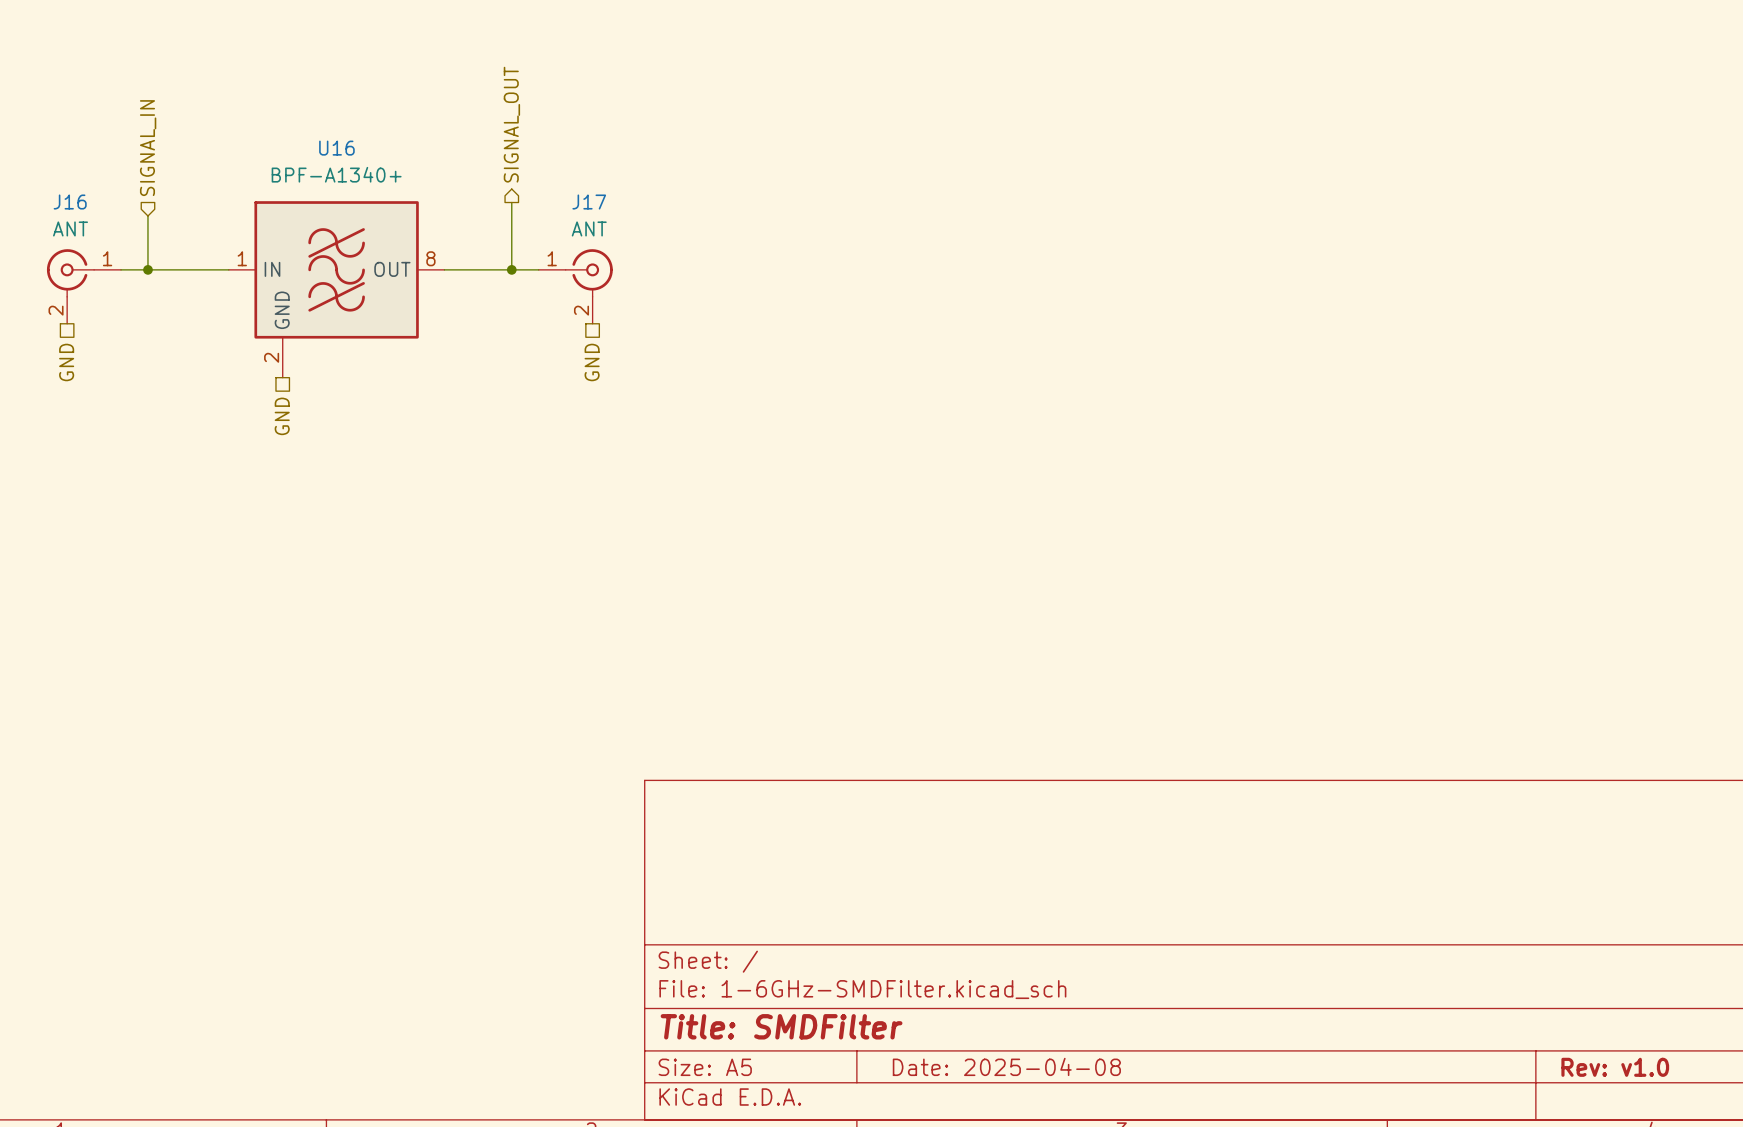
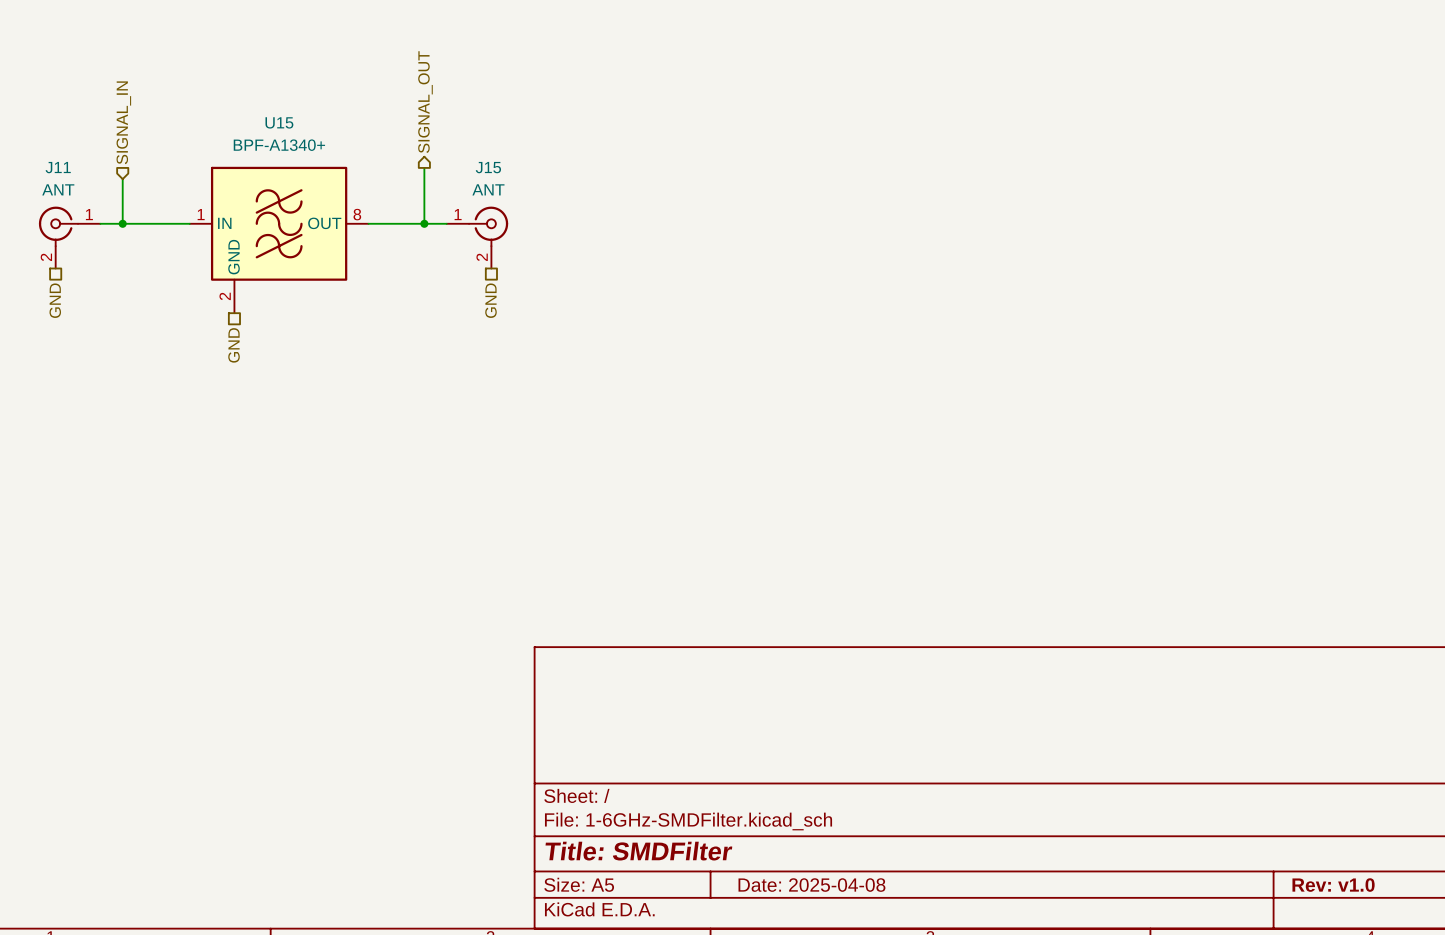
U16 name: U16 (336, 148) -> U15 (279, 122)
J16 name: J16 (70, 202) -> J11 (58, 167)
J17 name: J17 (589, 202) -> J15 (488, 167)

